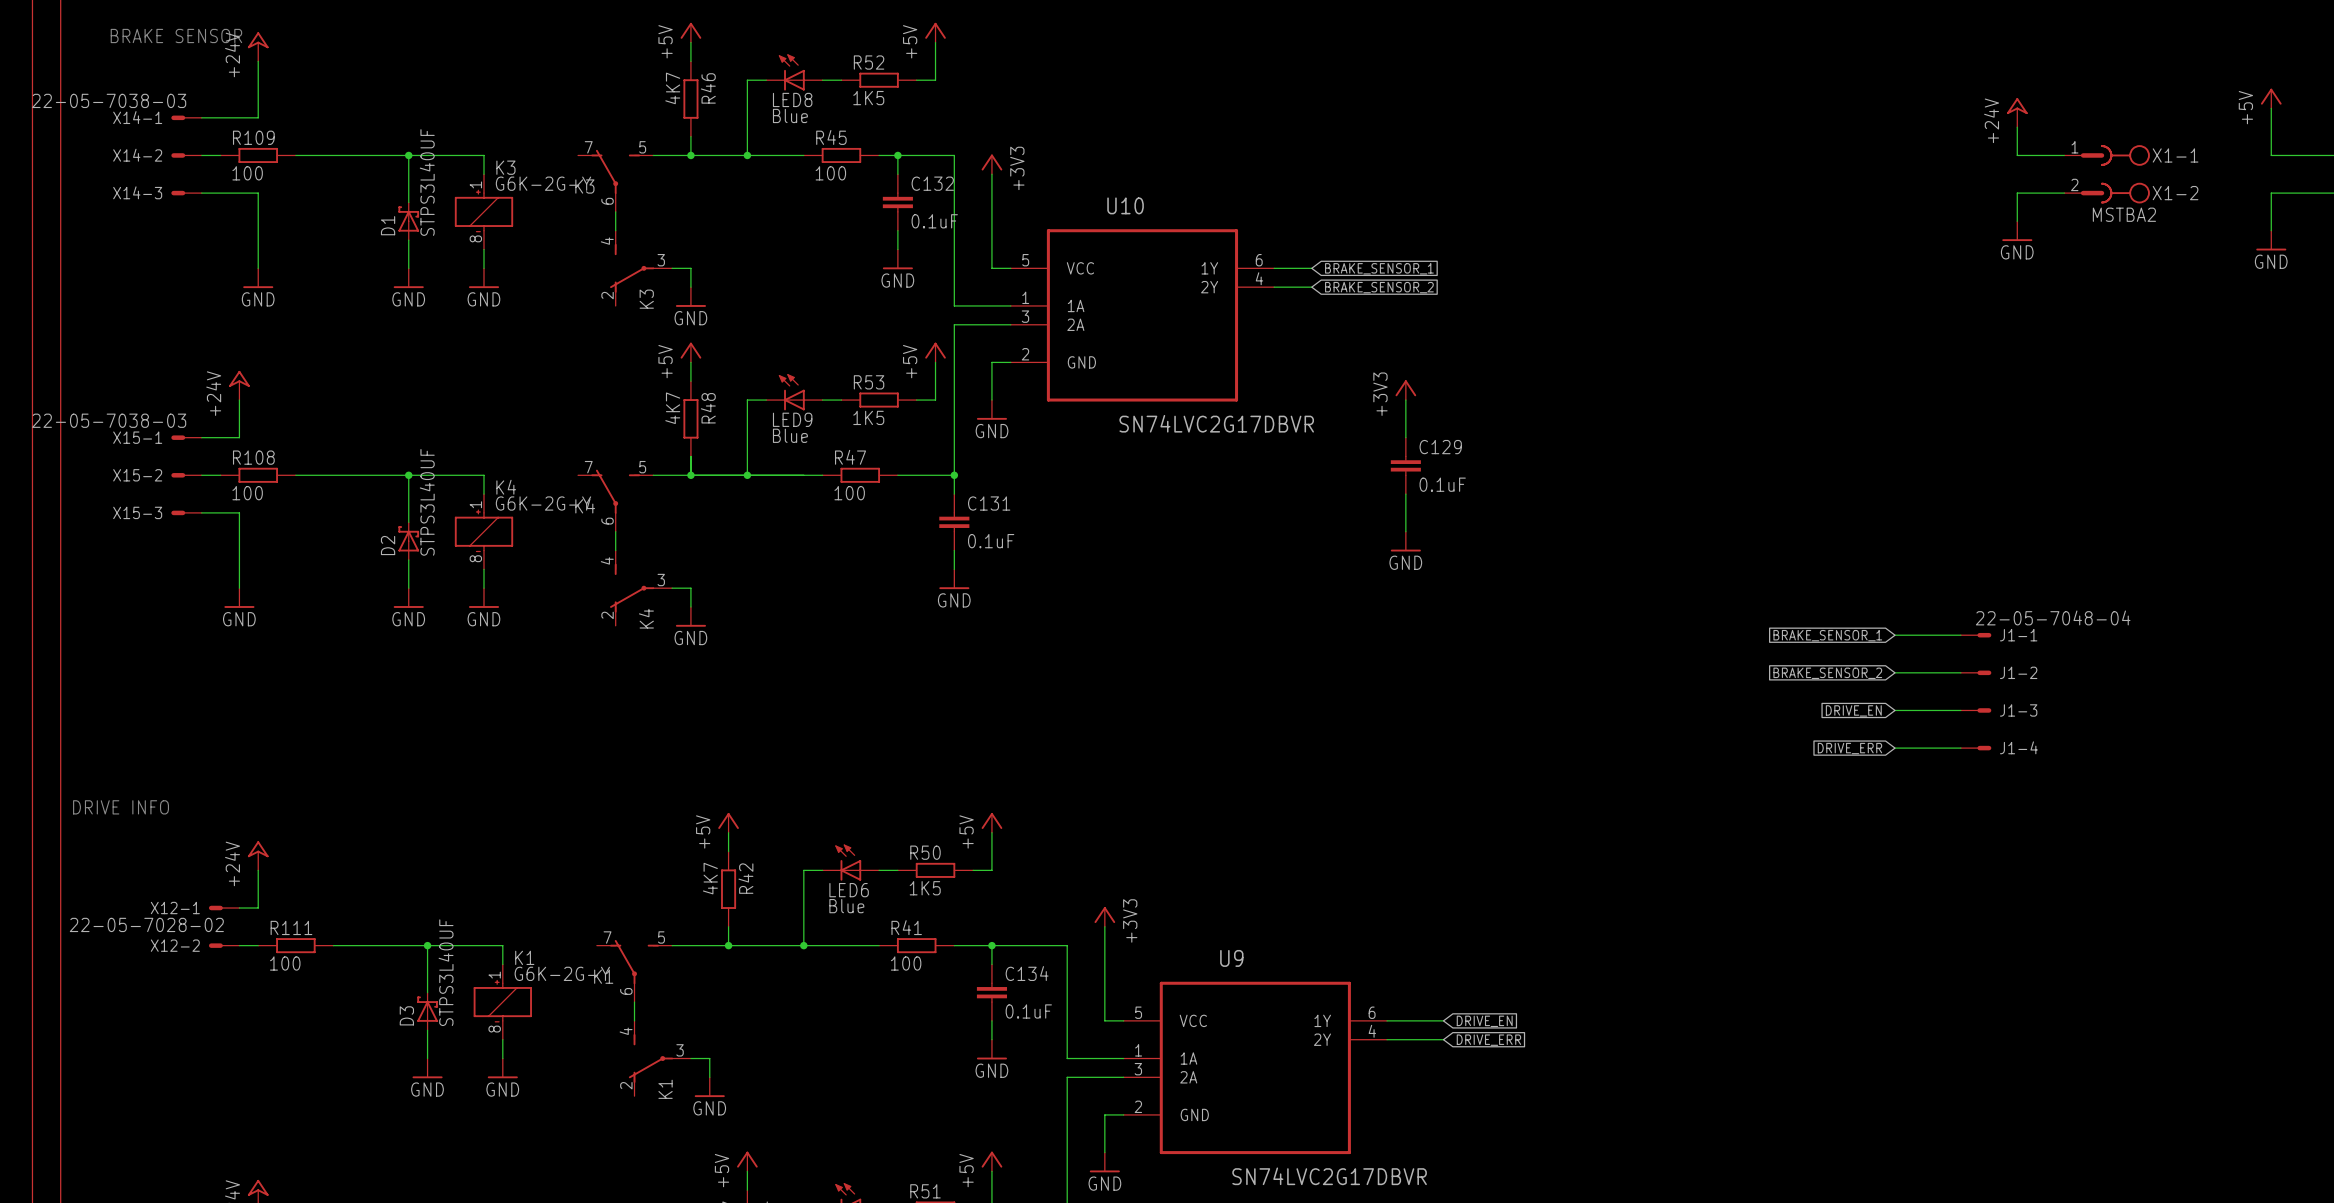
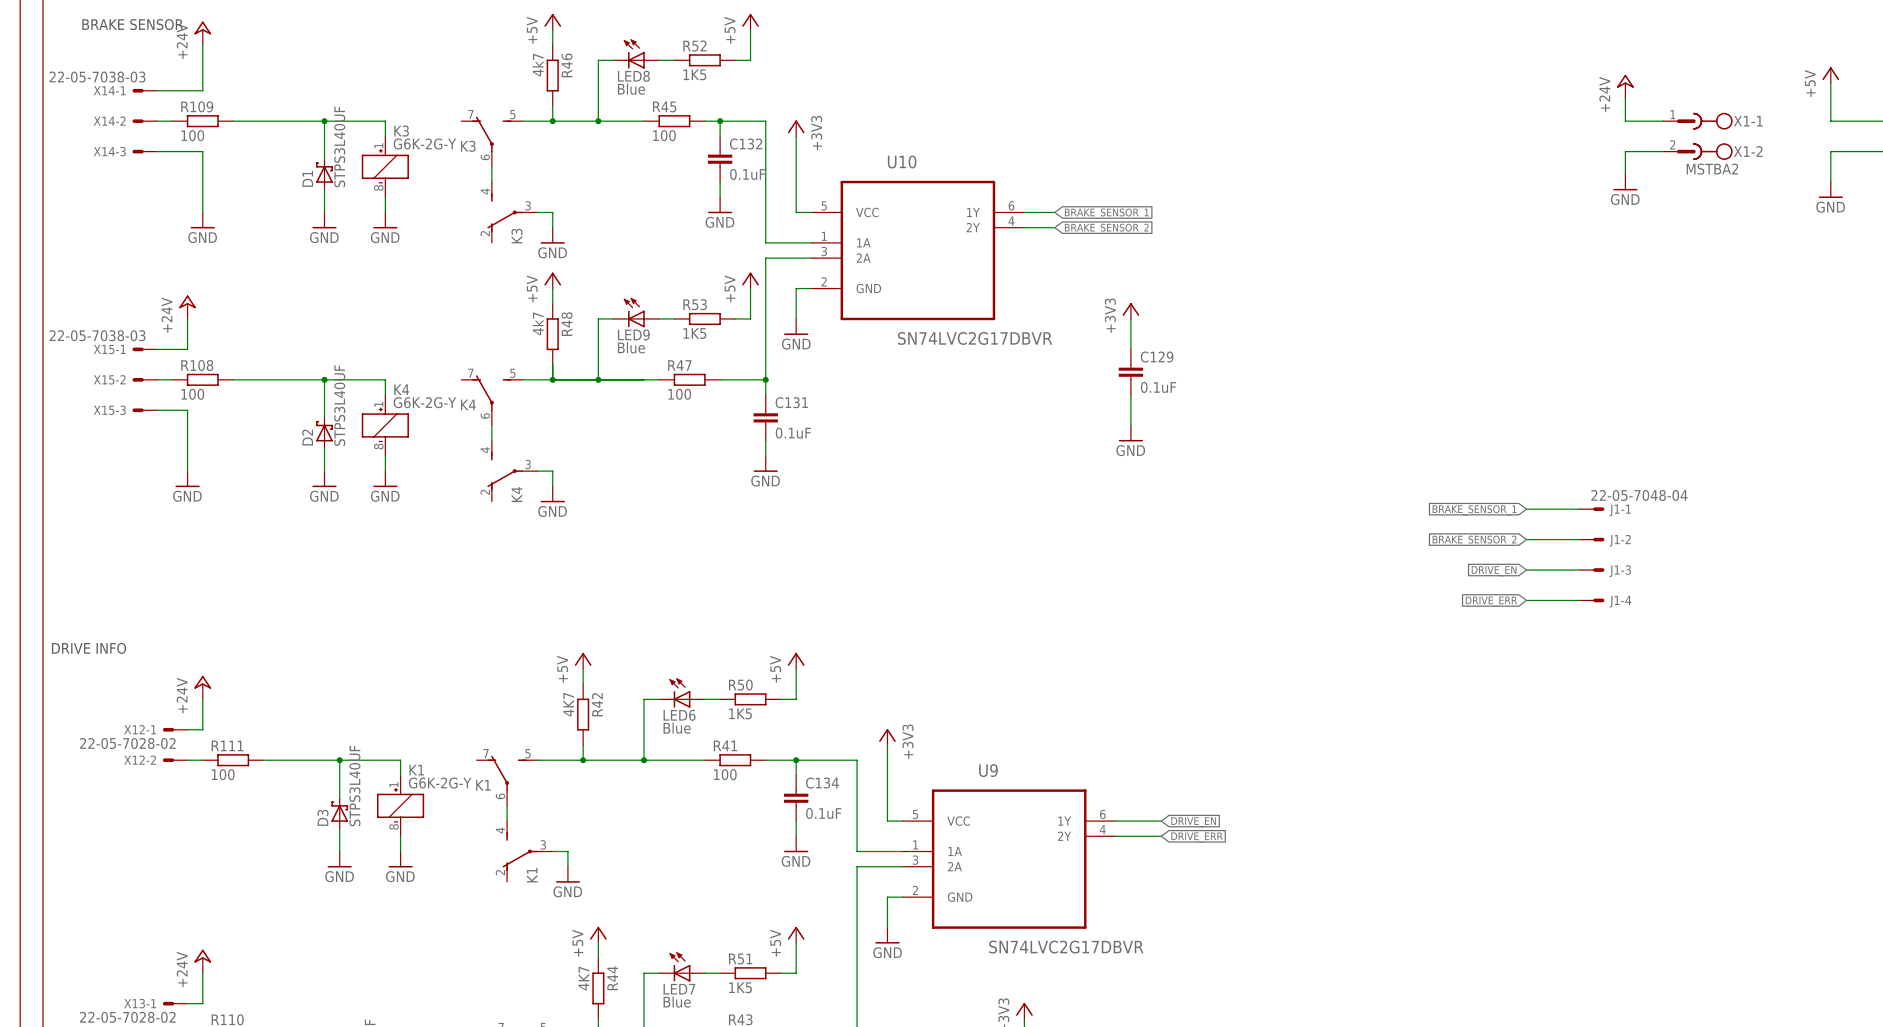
R46 value: 4K7 (672, 88) -> 4k7 (538, 65)
R48 value: 4K7 (672, 408) -> 4k7 (538, 323)

